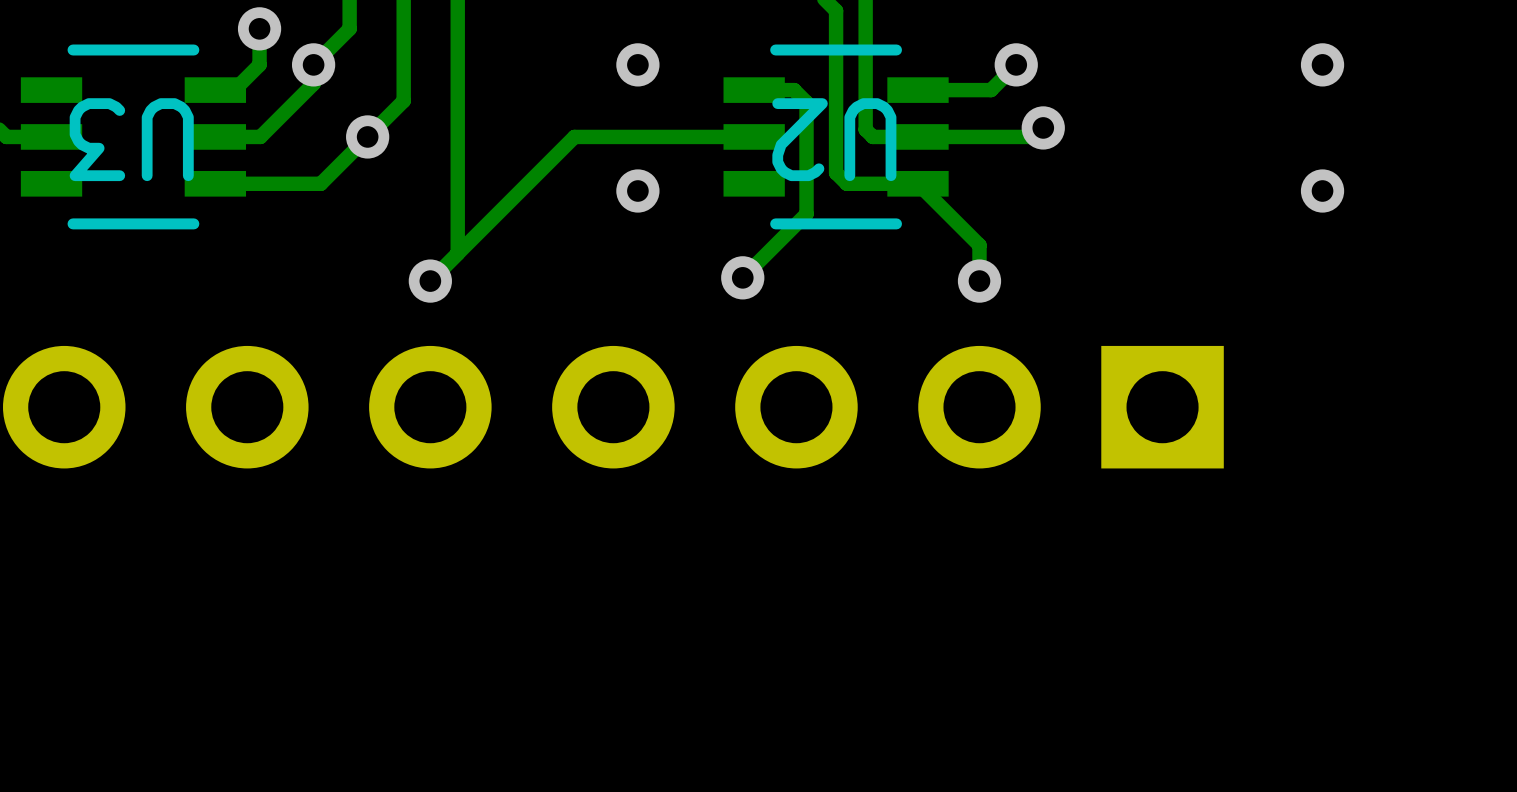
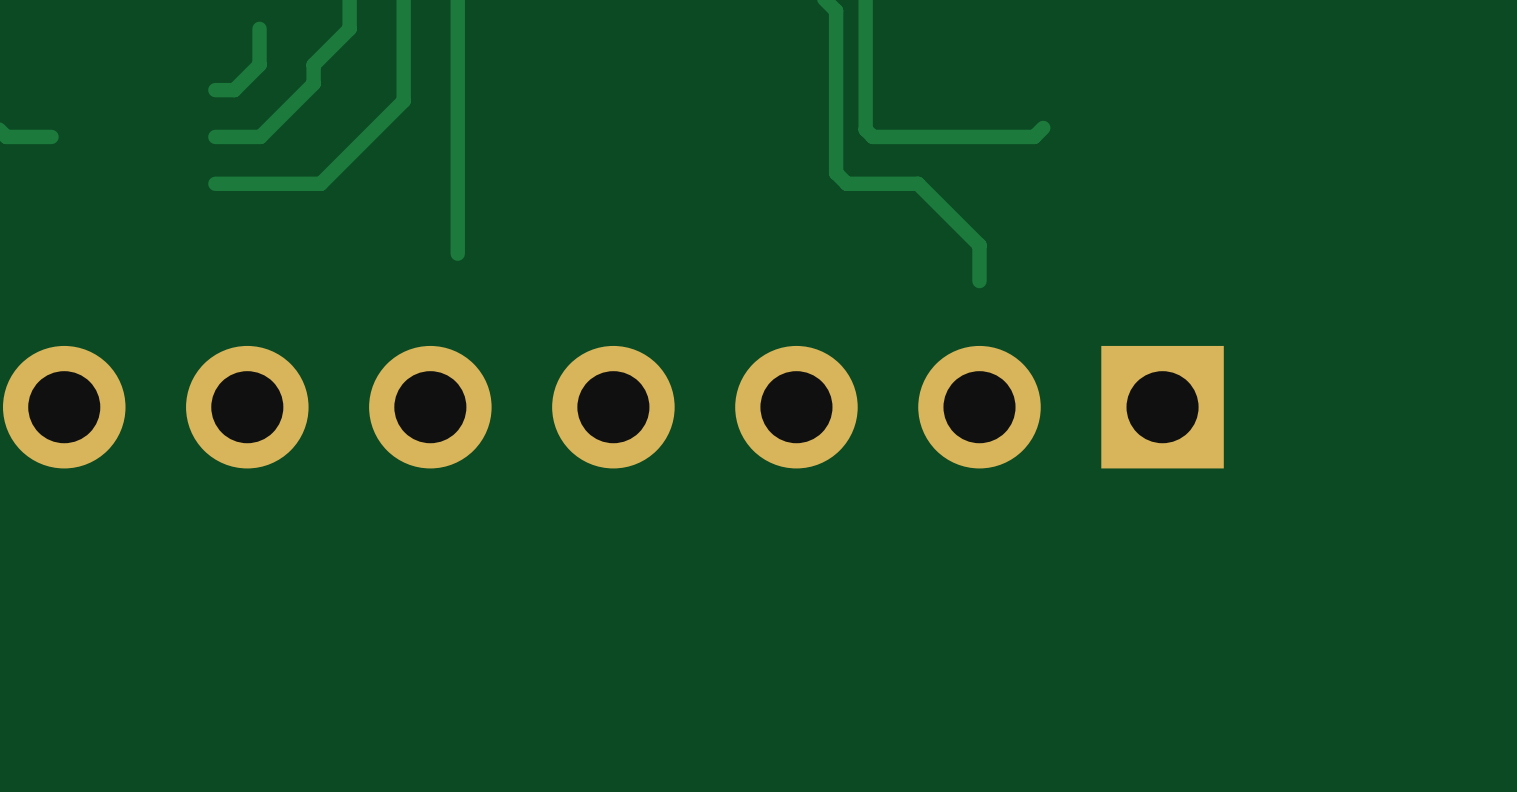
via: (259, 28) -> none
via: (313, 64) -> none
via: (637, 64) -> none
track: (1016, 64) (991, 90) (918, 90) -> none
via: (1016, 64) -> none
via: (1322, 64) -> none
track: (754, 90) (794, 90) (806, 102) (806, 214) (742, 277) -> none
via: (1043, 127) -> none
U3: (133, 136) -> none
via: (367, 136) -> none
track: (754, 136) (574, 136) (430, 281) -> none
U2: (836, 136) -> none
via: (637, 190) -> none
via: (1322, 190) -> none
via: (742, 277) -> none
via: (430, 281) -> none
via: (979, 281) -> none

